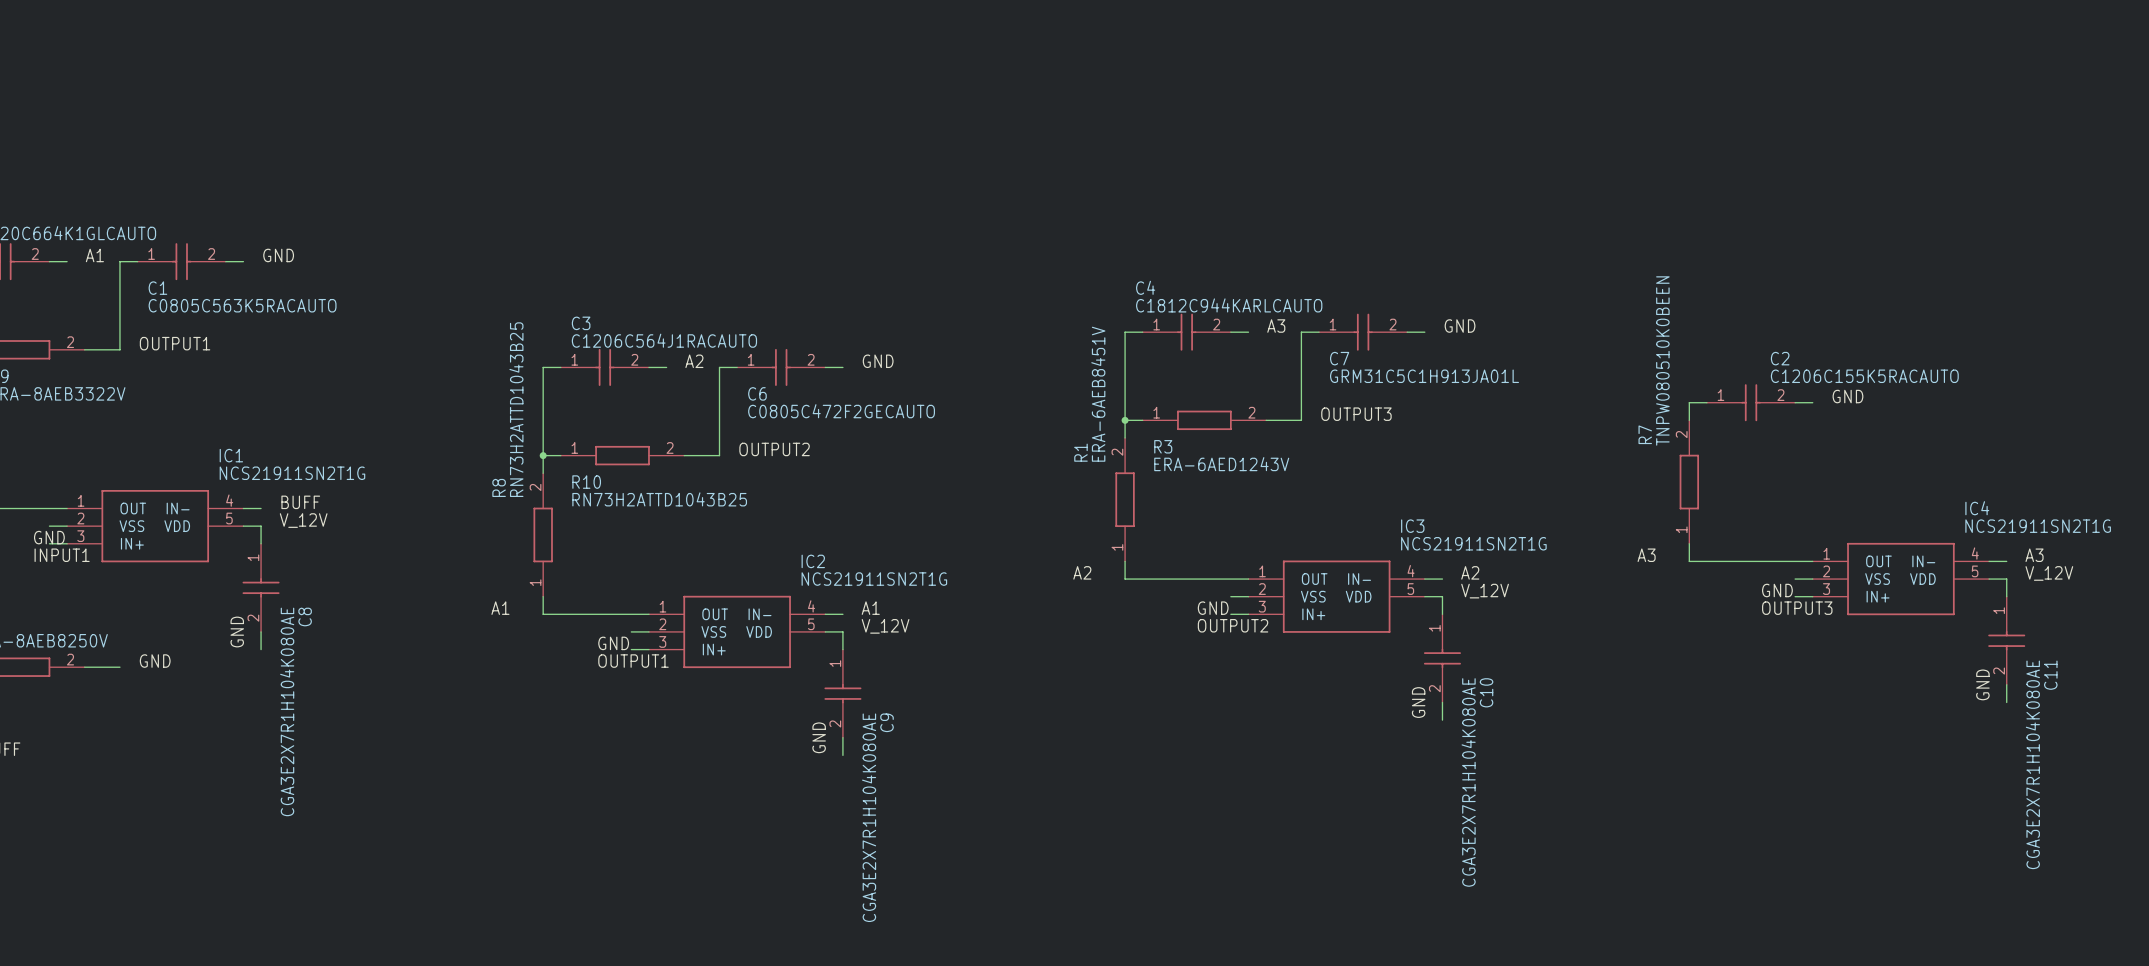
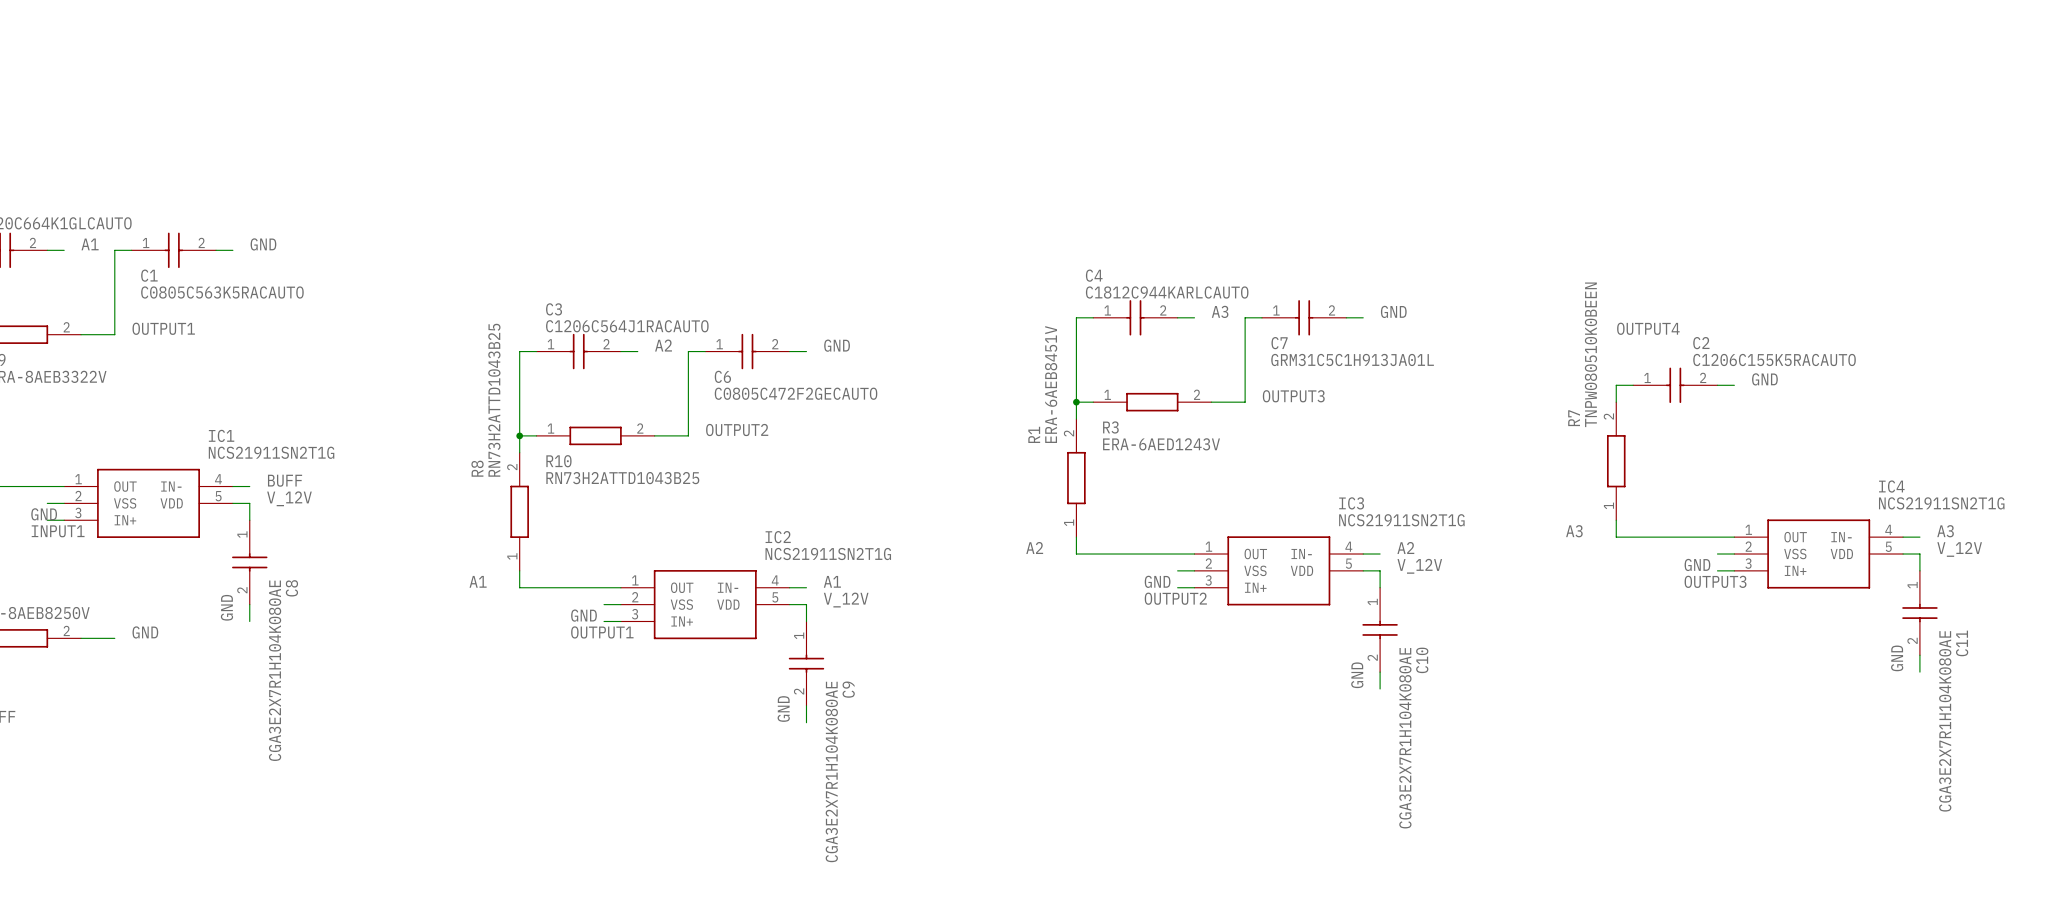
label: none -> OUTPUT4 (1648, 328)

